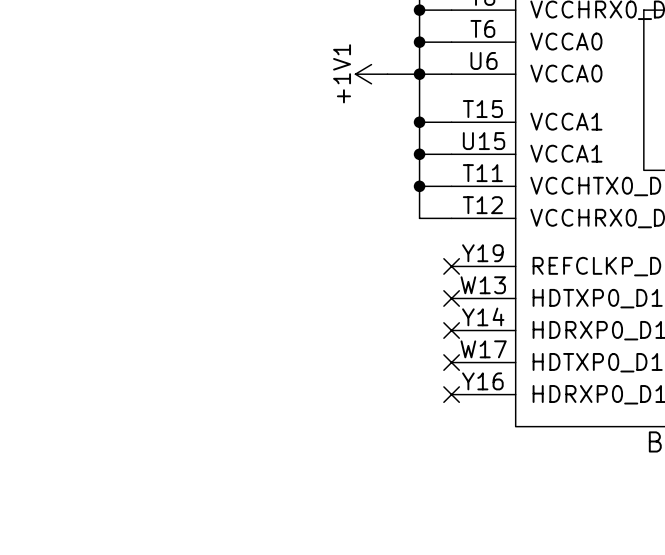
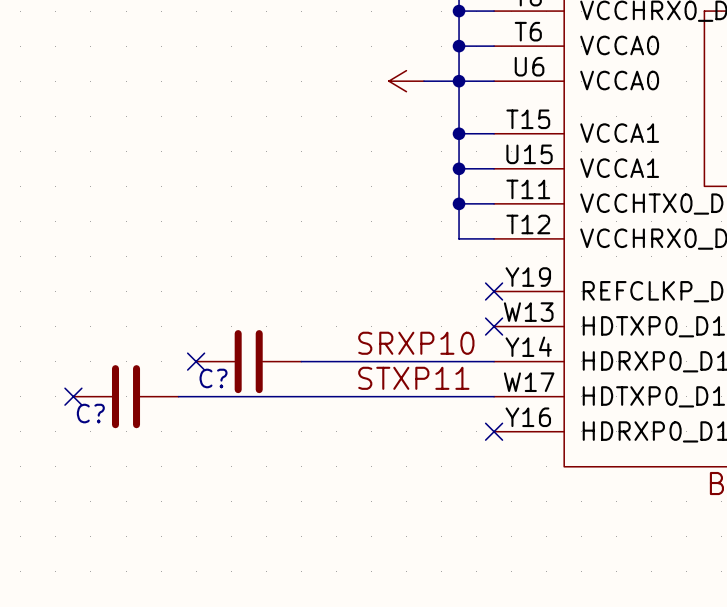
power symbol text: +1V1 (342, 73) -> none
label: none -> SRXP10 (416, 343)
no-connect mark: none -> (196, 361)
C?: none -> (248, 361)
wire: none -> (301, 361) (494, 361)
no-connect mark: (451, 330) -> none
label: none -> STXP11 (413, 378)
no-connect mark: none -> (73, 396)
C?: none -> (126, 396)
wire: none -> (178, 396) (494, 396)
no-connect mark: (451, 362) -> none

